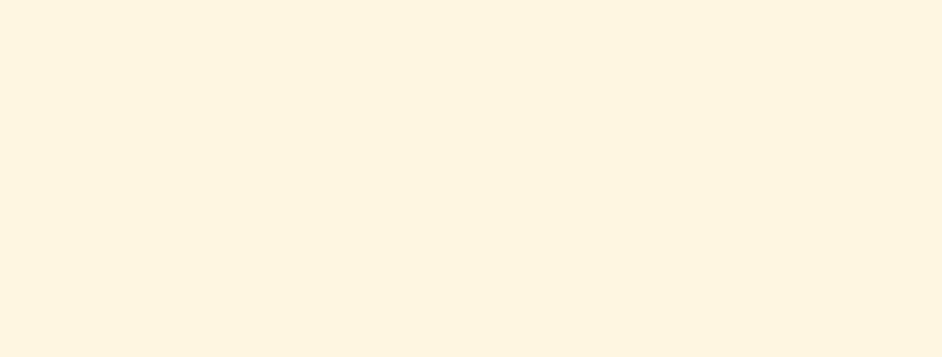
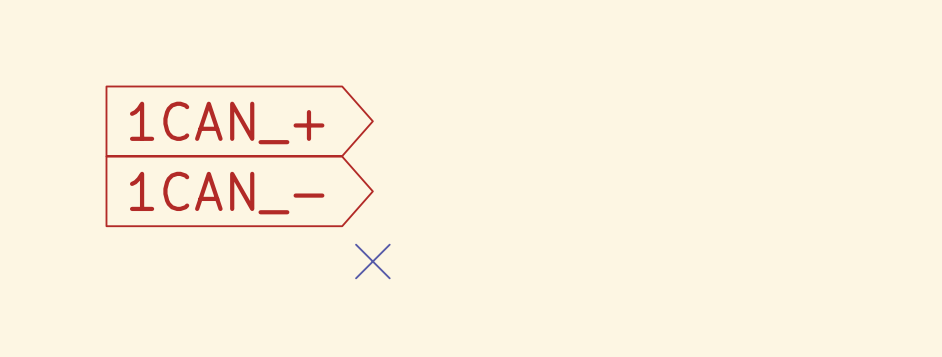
global label: none -> 1CAN_+ (227, 122)
global label: none -> 1CAN_- (227, 193)
no-connect mark: none -> (372, 261)

